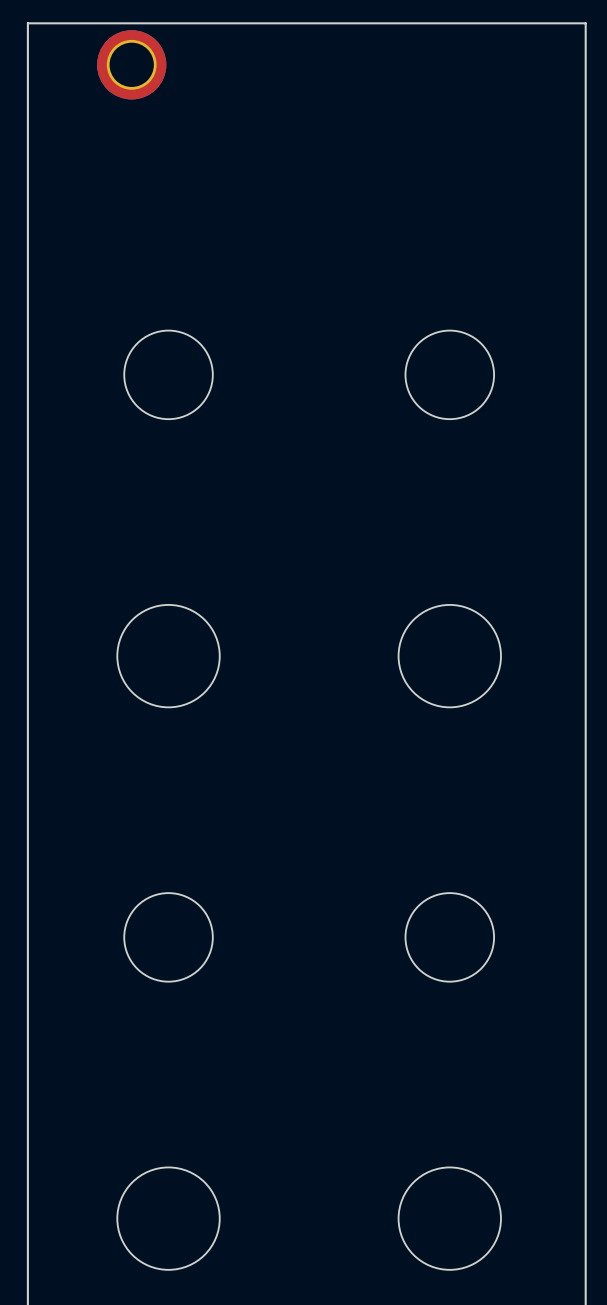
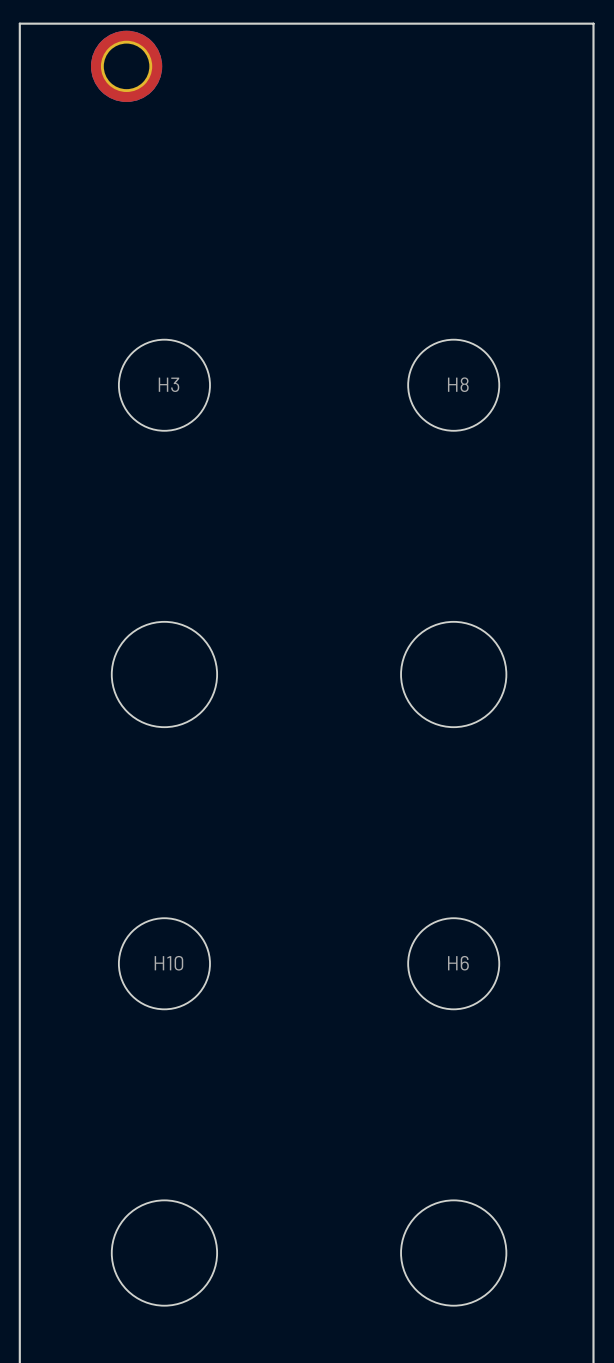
H3 name: none -> H3 (169, 384)
H8 name: none -> H8 (458, 384)
H10 name: none -> H10 (168, 963)
H6 name: none -> H6 (458, 963)

